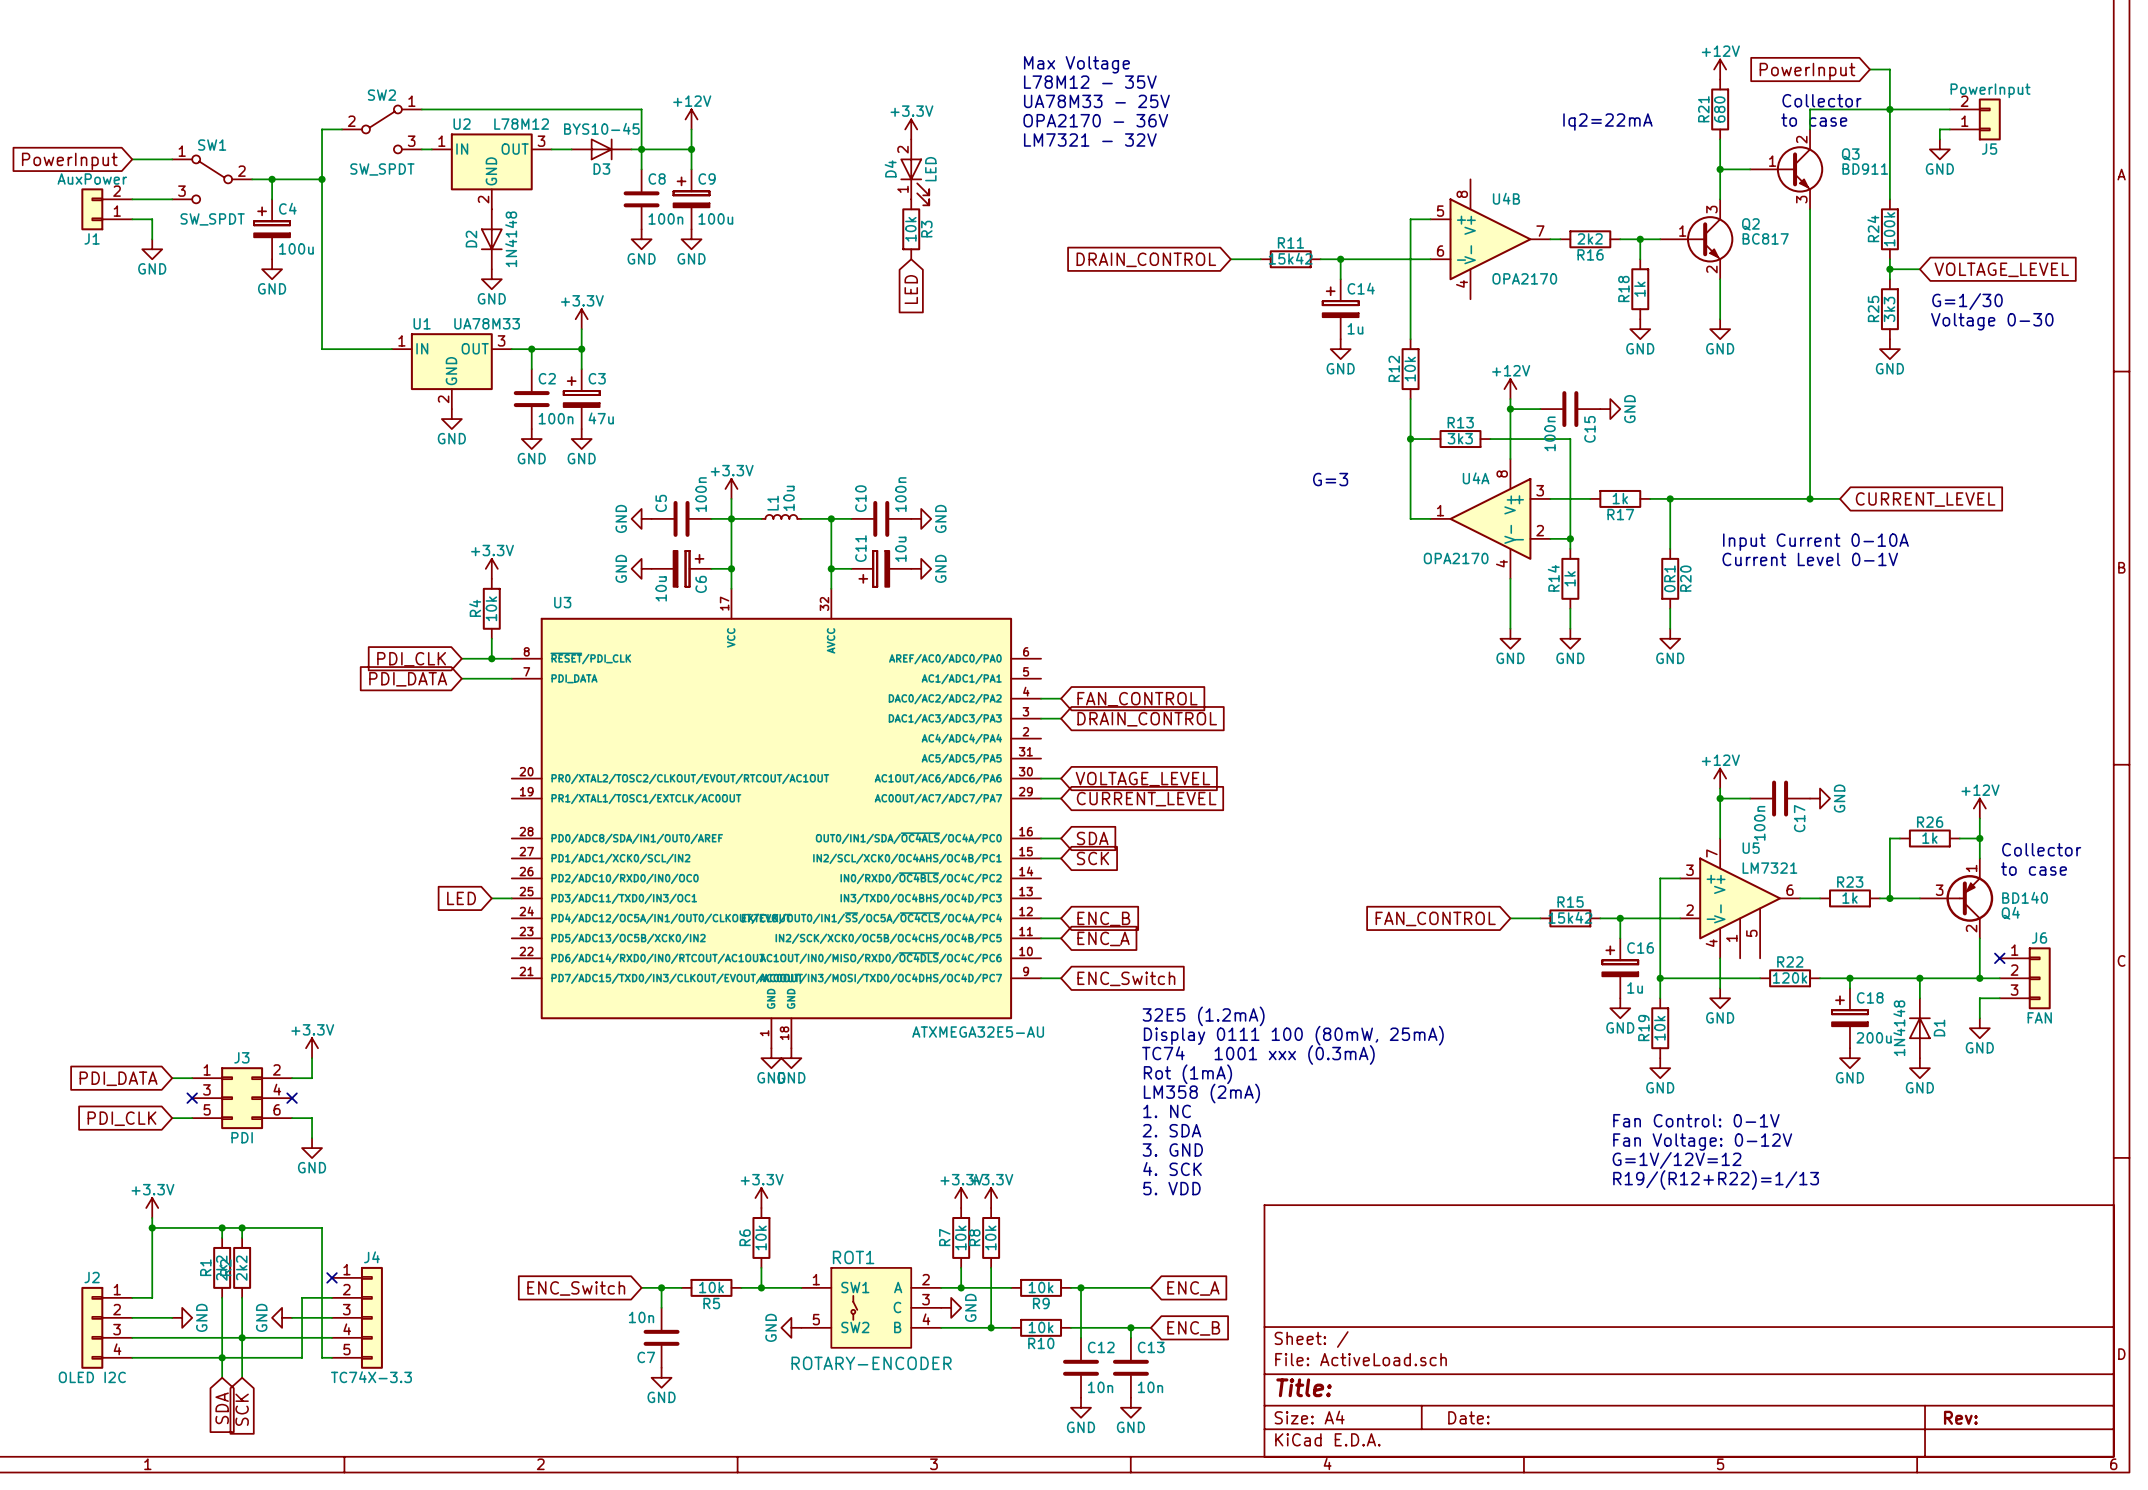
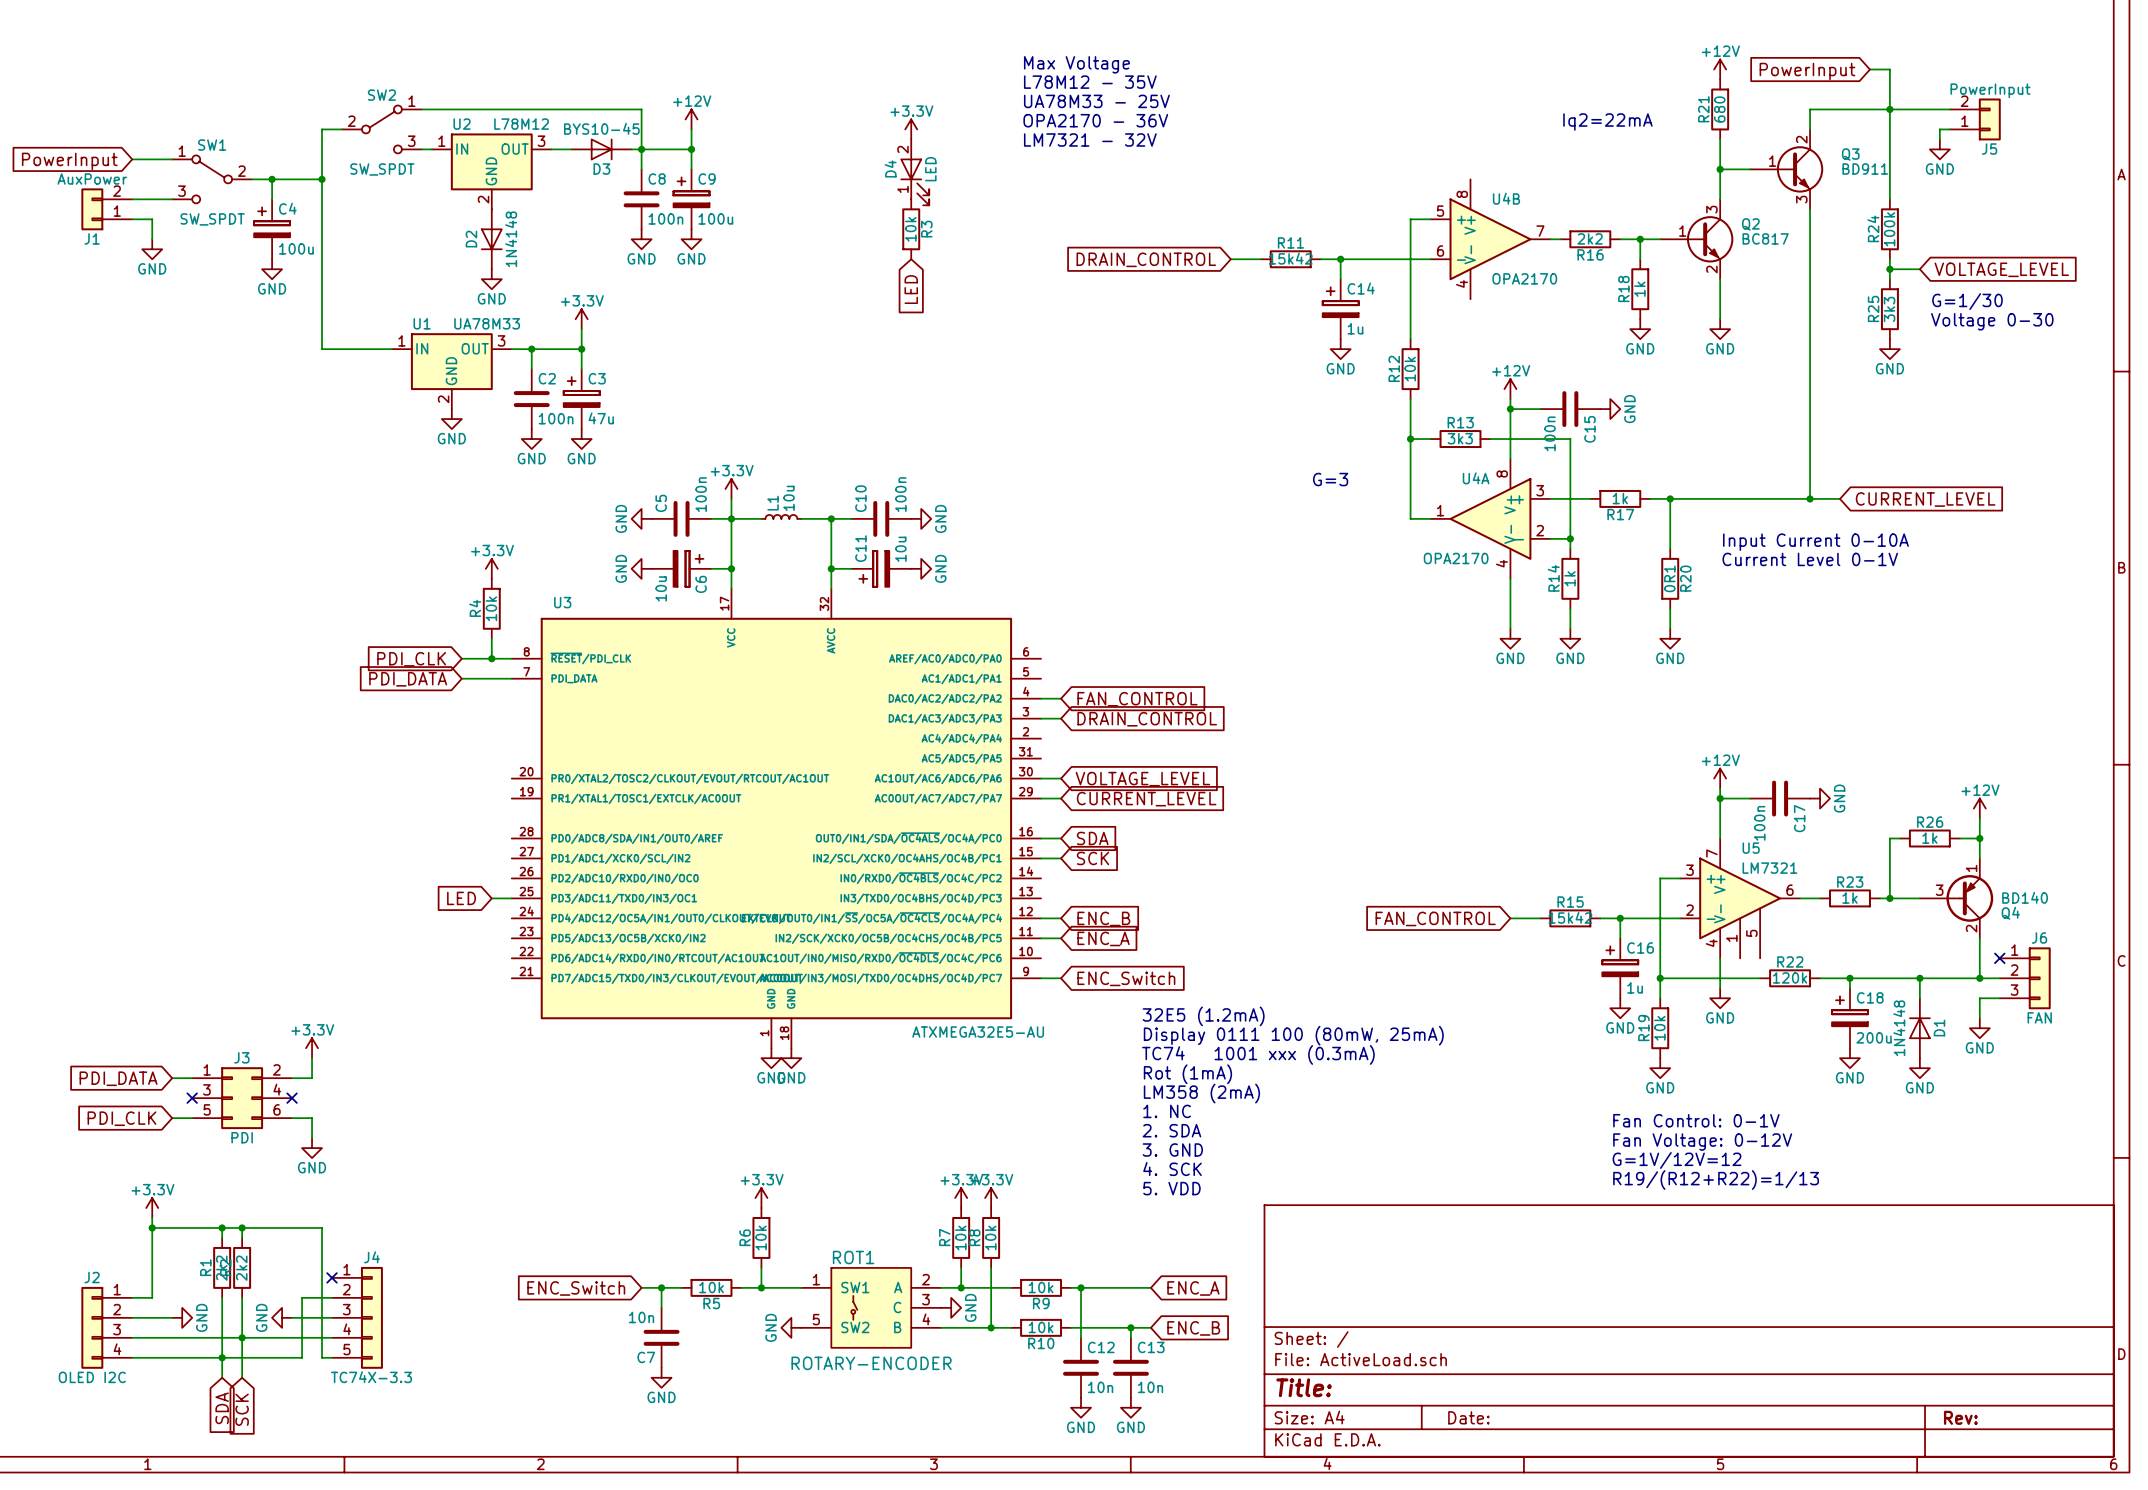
text: Collector (1821, 100) -> none
text: to case (1814, 120) -> none
text: Collector (2041, 849) -> none
text: to case (2033, 869) -> none

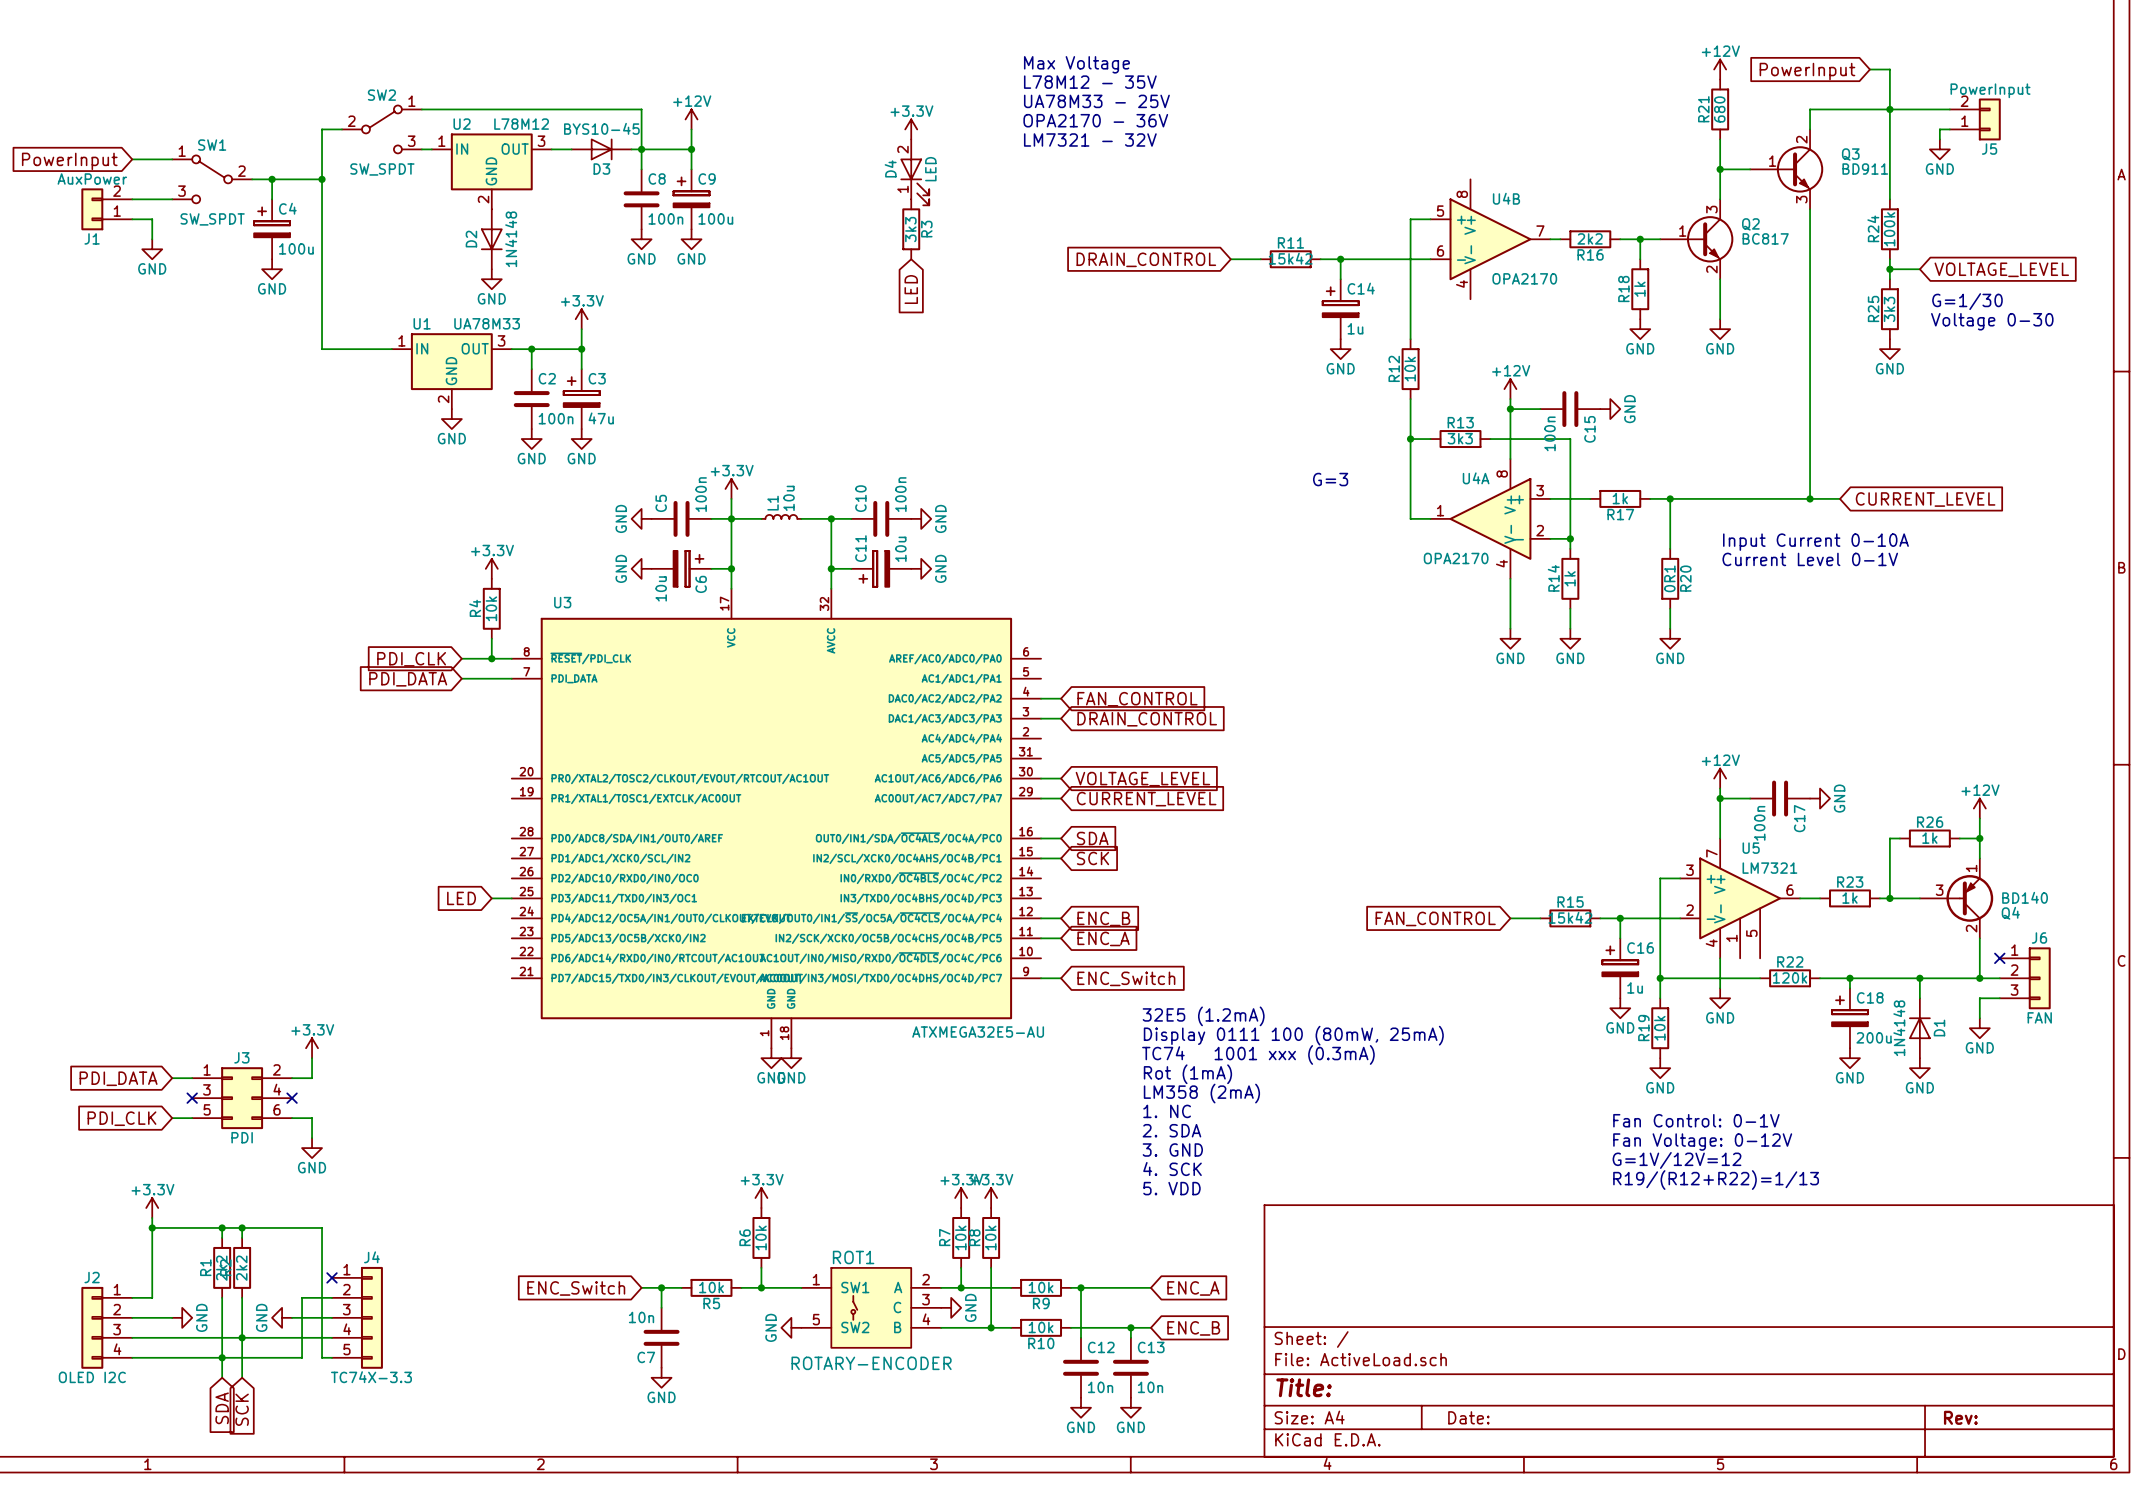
text: Iq2=22mA (1607, 122) -> none
R3 value: 10k (910, 229) -> 3k3 (910, 229)

